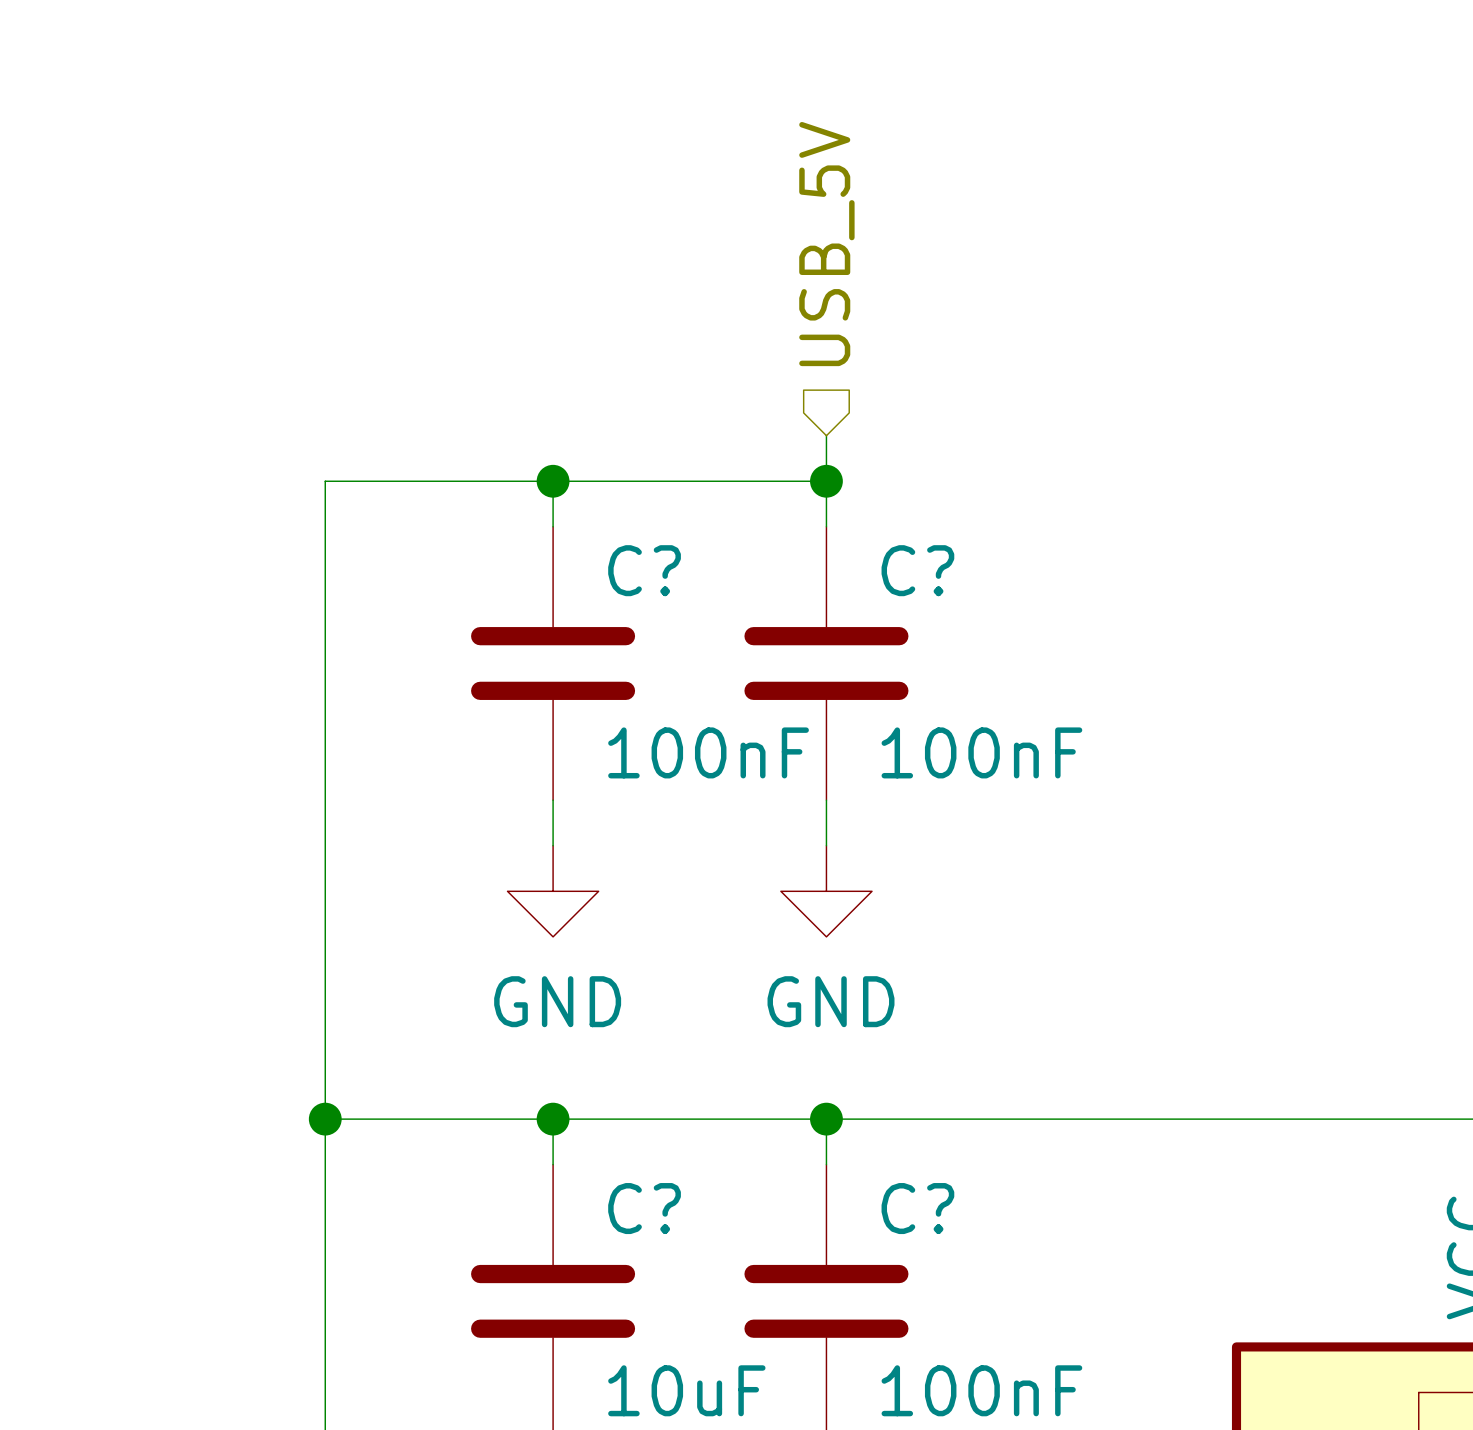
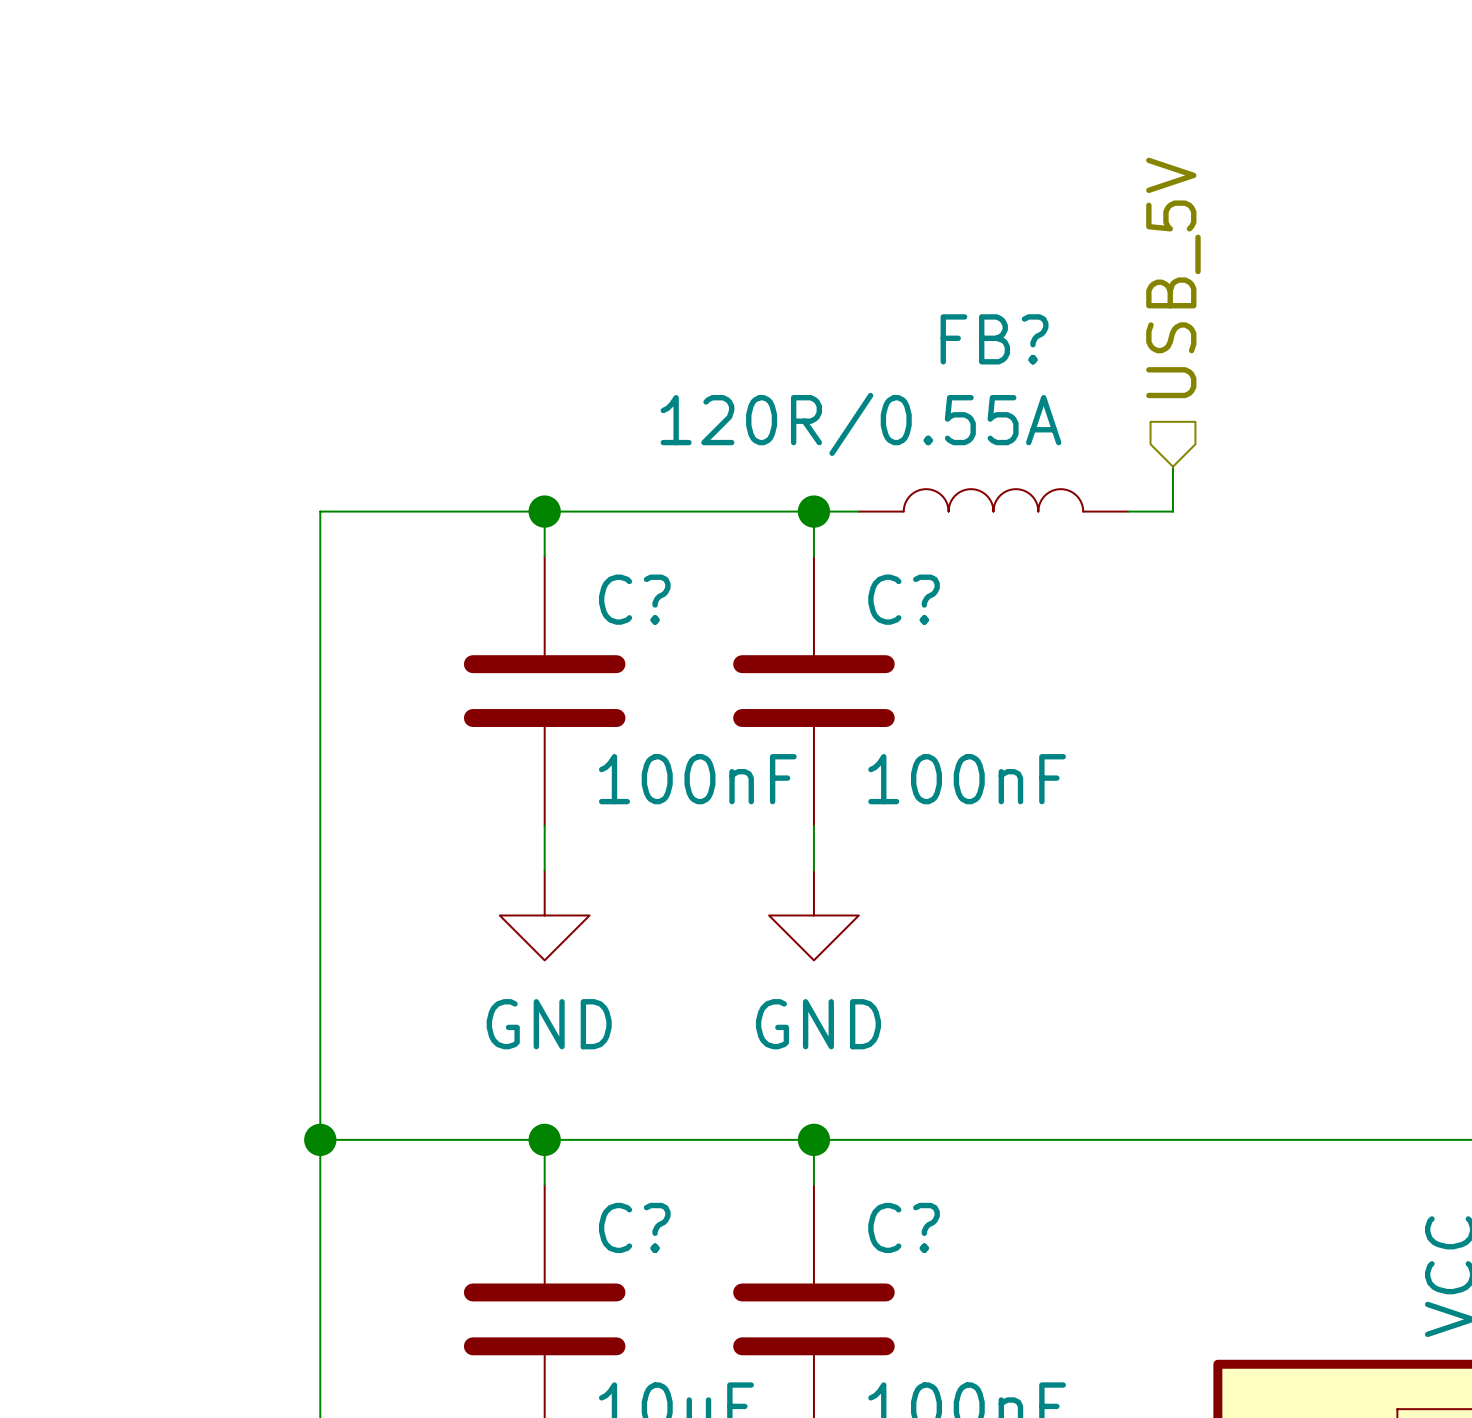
hierarchical label position: USB_5V (826, 244) -> USB_5V (1173, 277)
wire: (826, 435) (826, 481) -> (858, 511) (813, 511)
wire: none -> (1172, 466) (1172, 511) (1128, 511)
FB?: none -> 120R/0.55A (993, 500)

